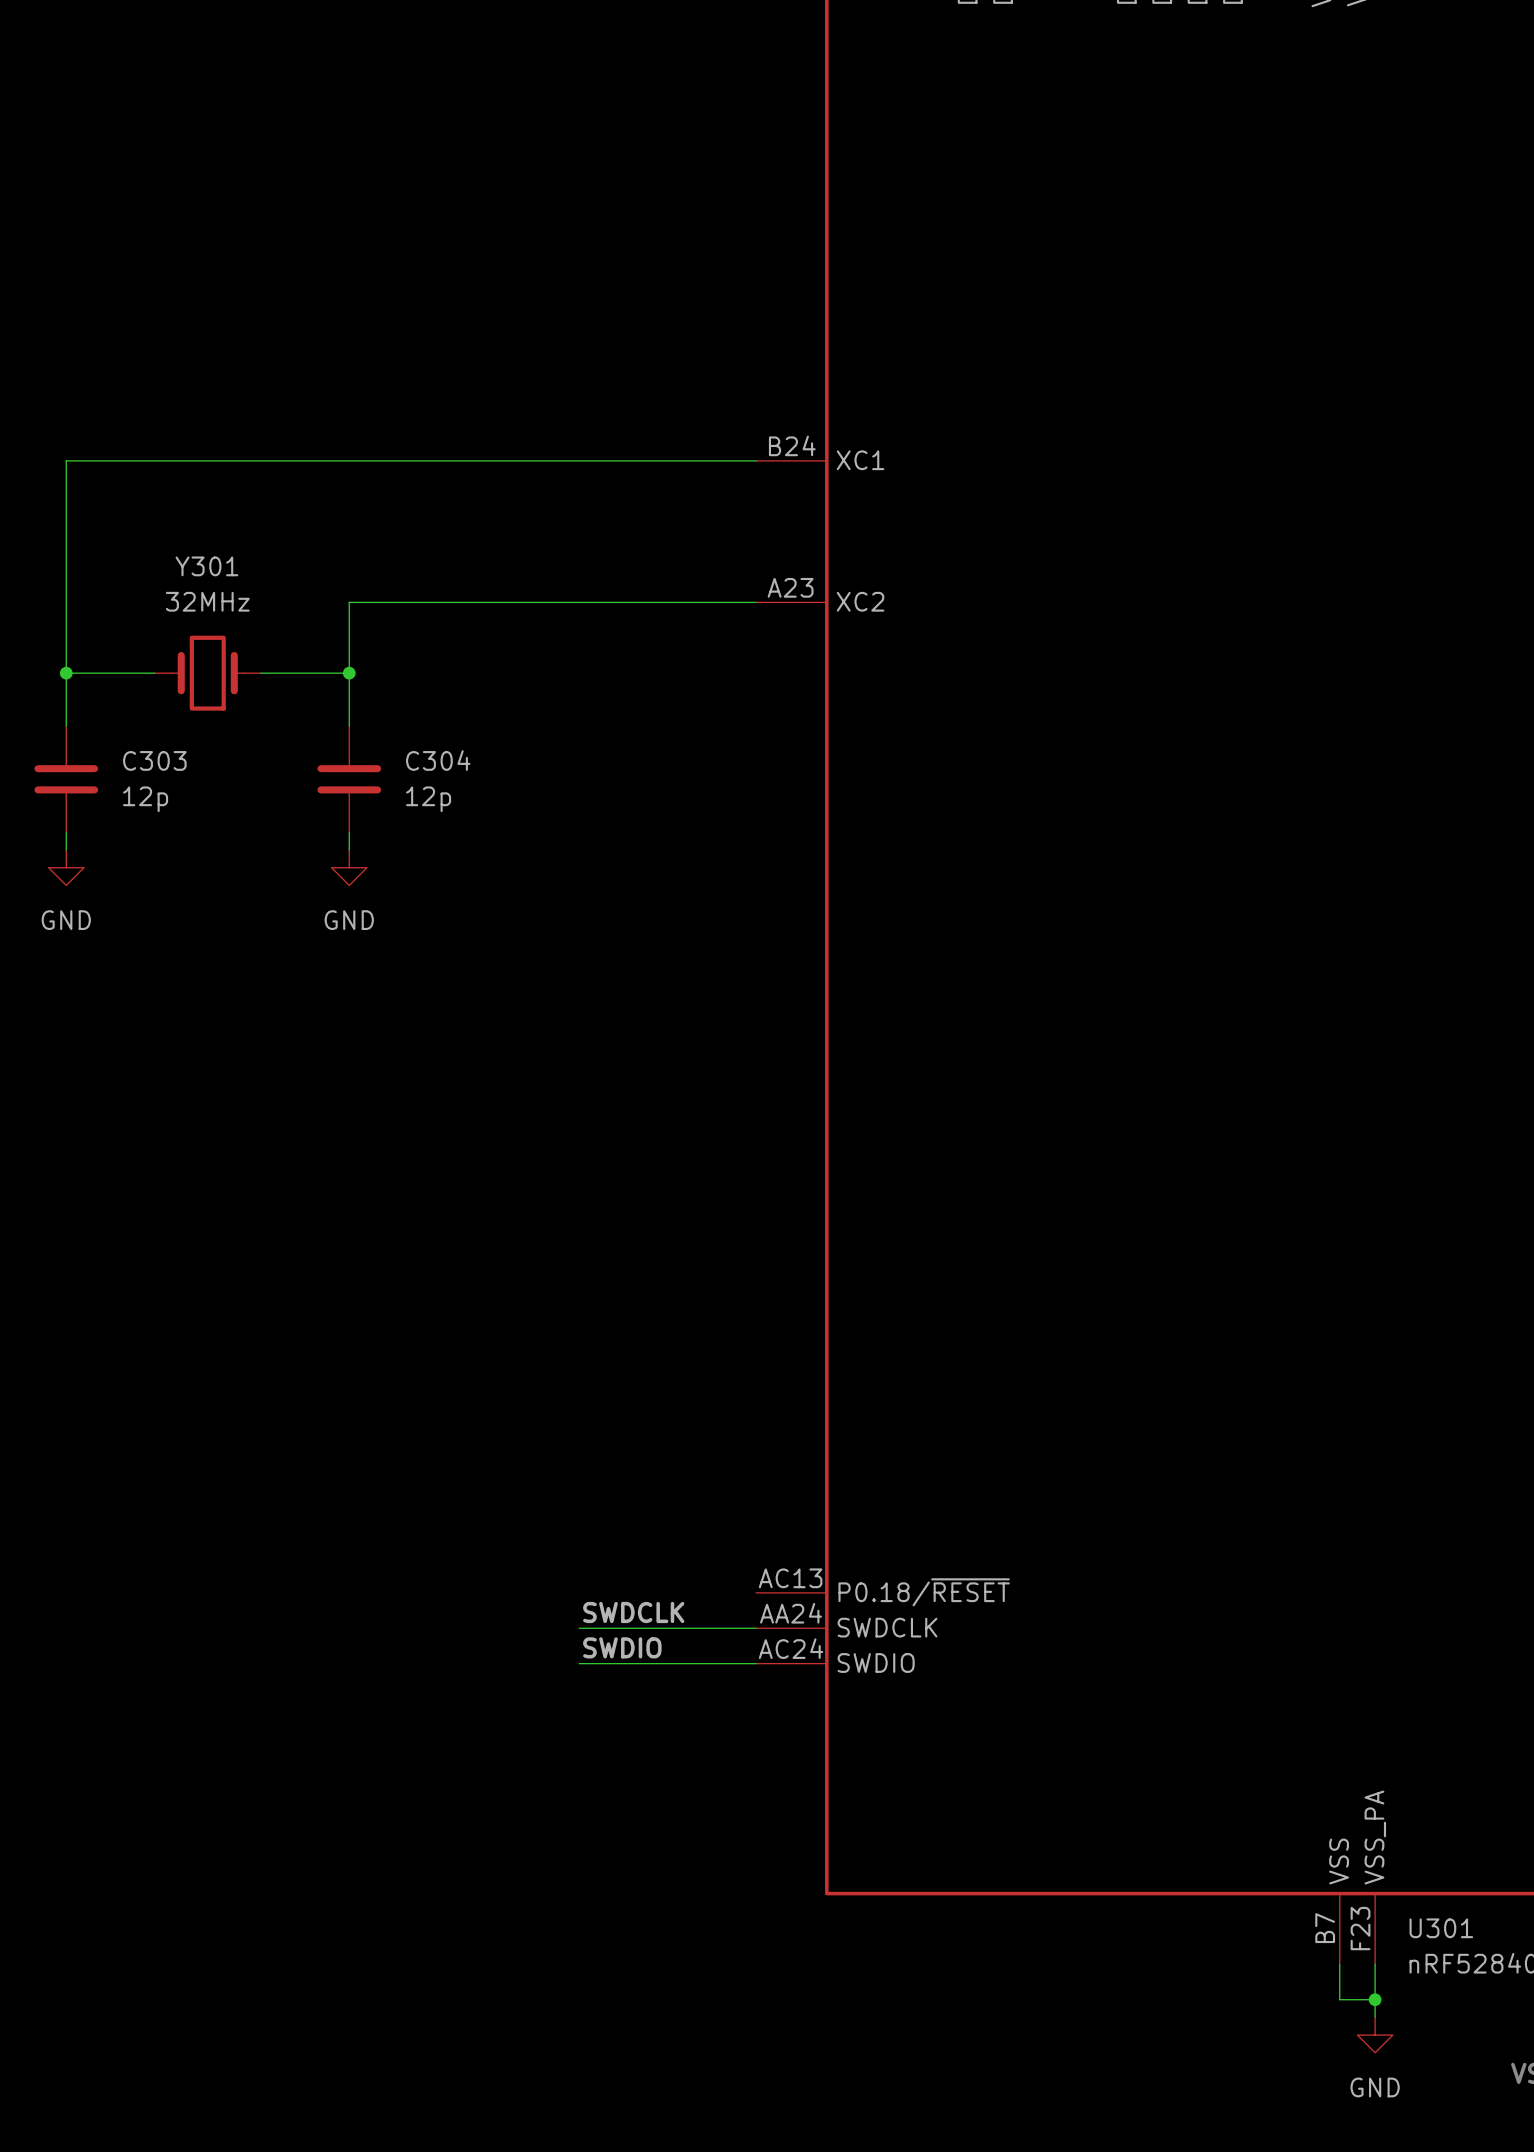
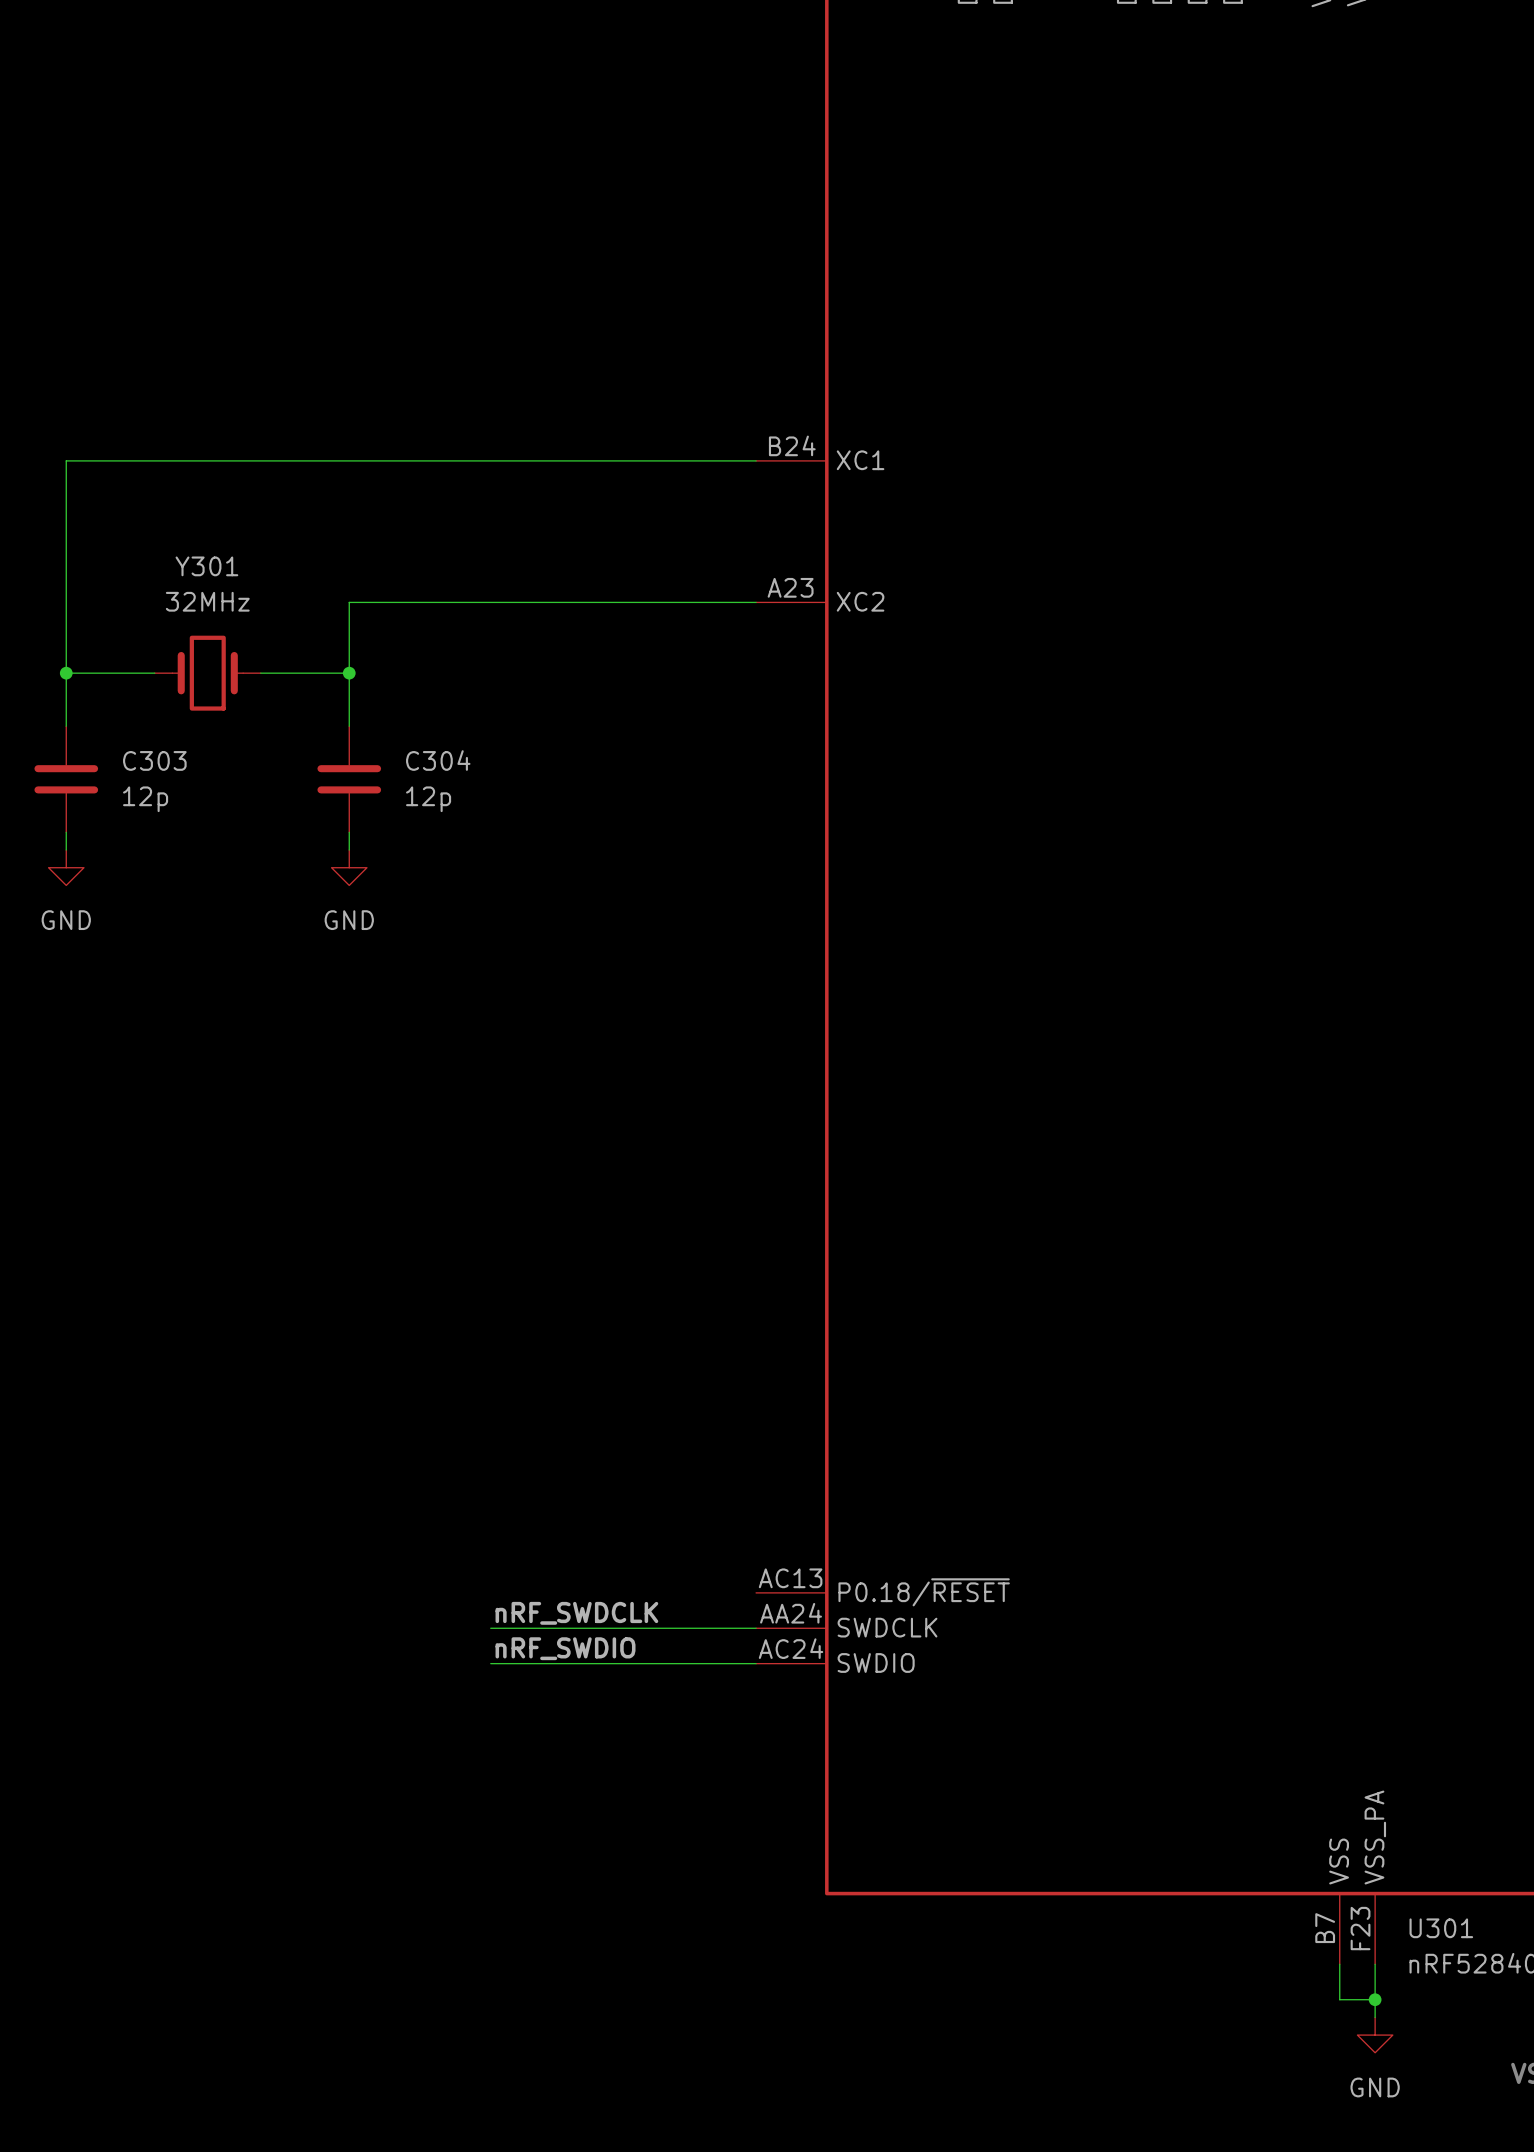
label: SWDCLK (633, 1612) -> nRF_SWDCLK (576, 1613)
wire: none -> (490, 1628) (579, 1628)
label: SWDIO (622, 1647) -> nRF_SWDIO (565, 1648)
wire: none -> (490, 1663) (579, 1663)

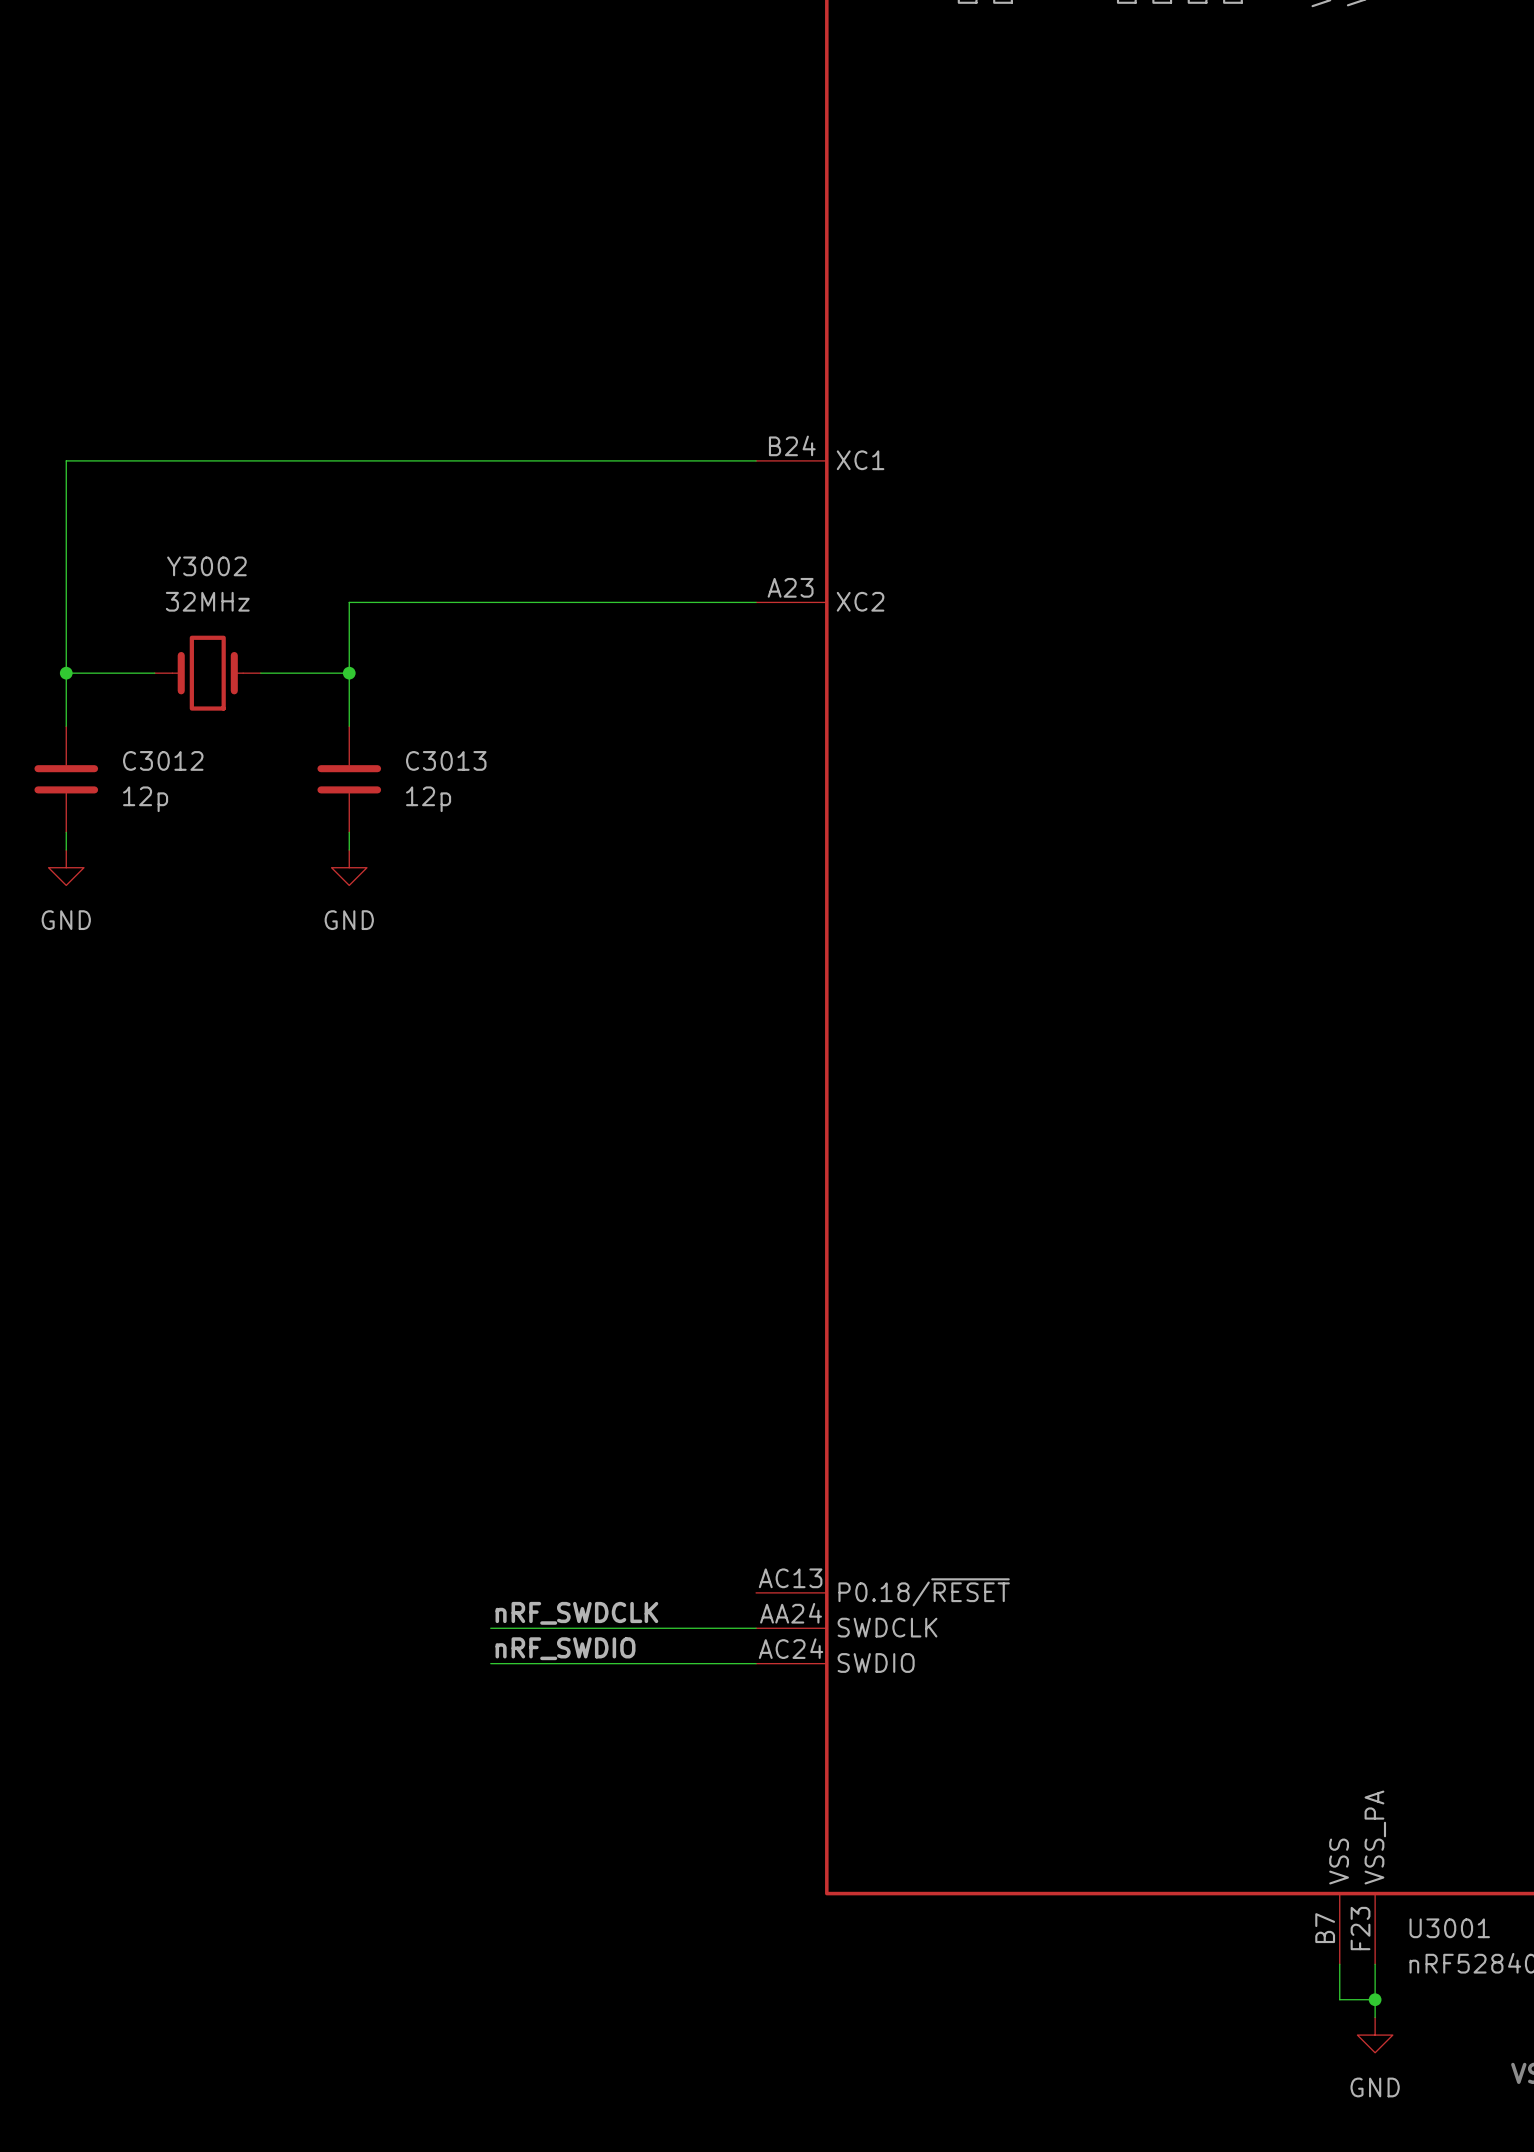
Y301 name: Y301 (206, 566) -> Y3002 (206, 566)
C303 name: C303 (154, 760) -> C3012 (163, 760)
C304 name: C304 (438, 760) -> C3013 (446, 760)
U301 name: U301 (1441, 1928) -> U3001 (1449, 1928)

